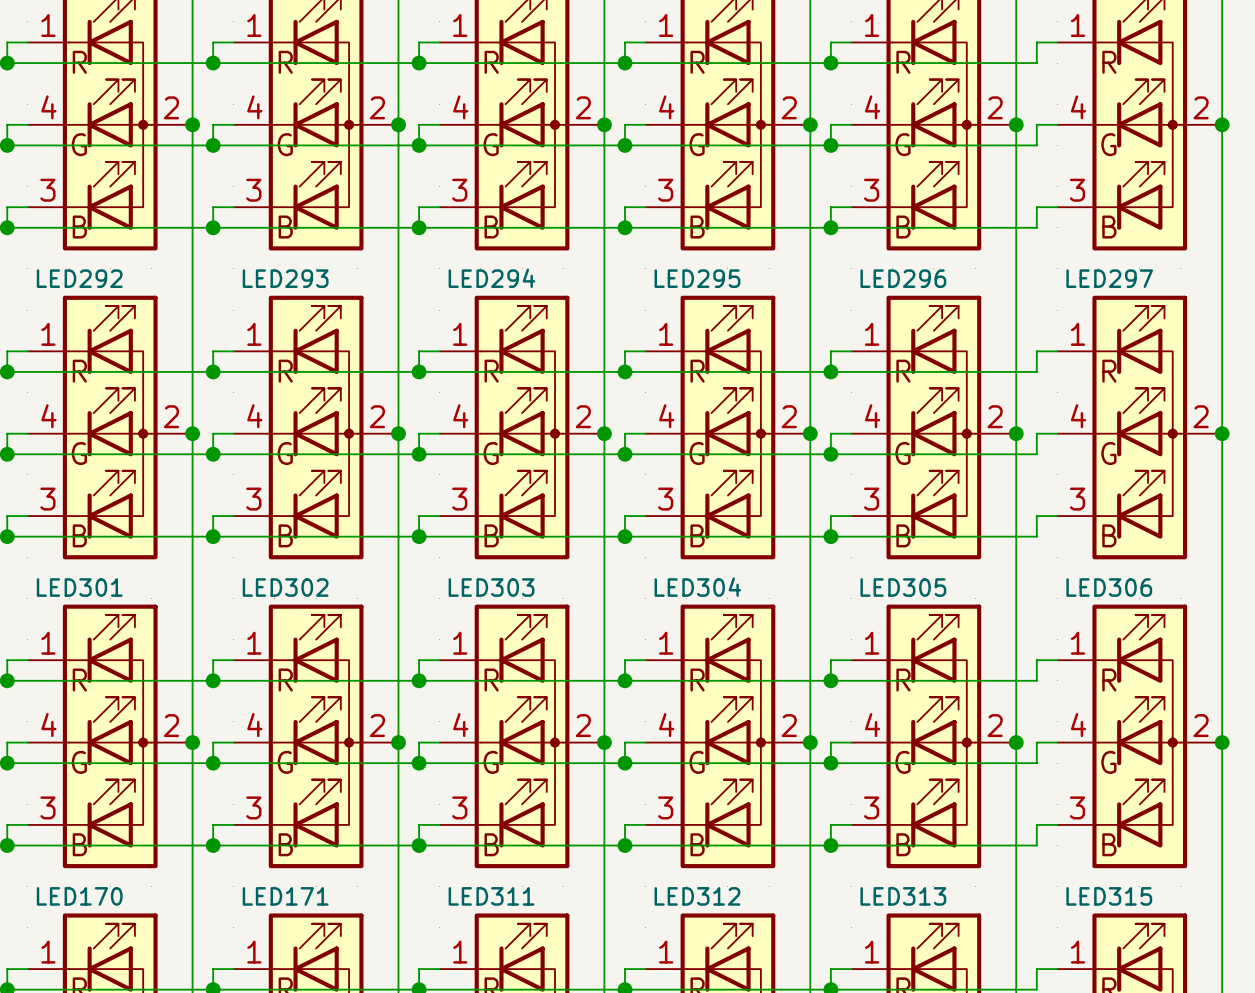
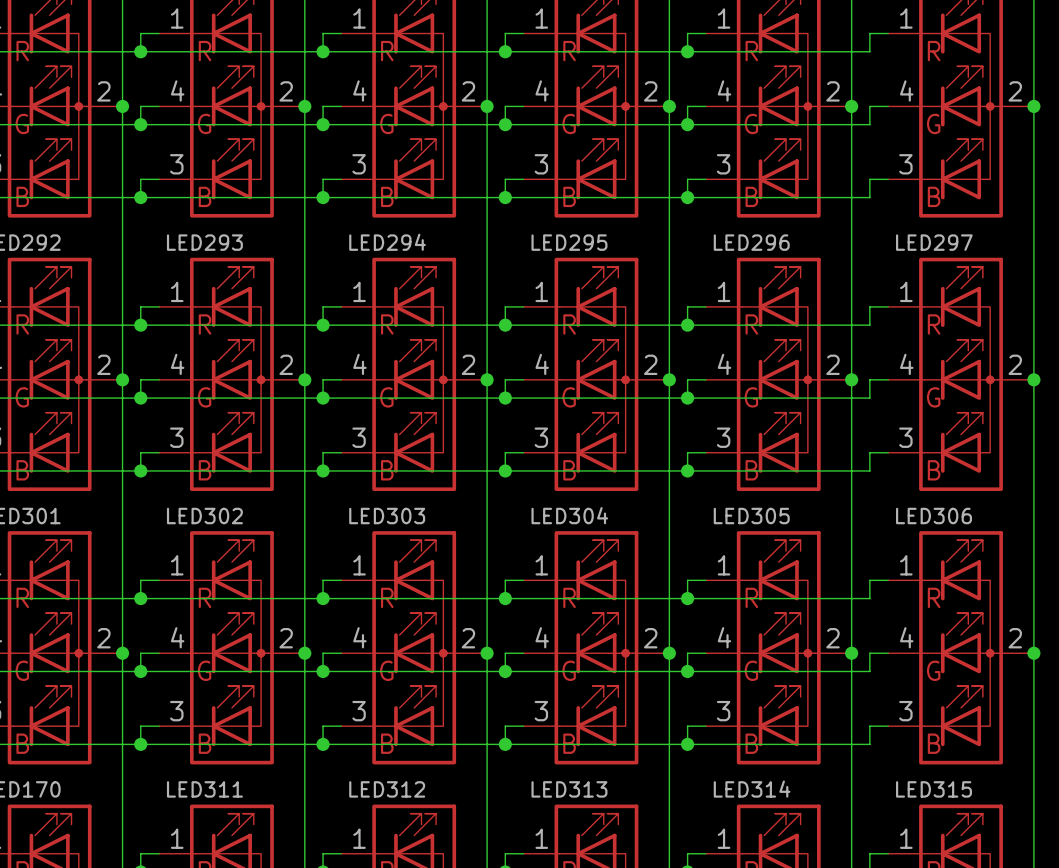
LED171 name: LED171 (285, 896) -> LED311 (204, 789)
LED311 name: LED311 (491, 896) -> LED312 (387, 789)
LED312 name: LED312 (697, 896) -> LED313 (569, 789)
LED313 name: LED313 (903, 896) -> LED314 (752, 789)

